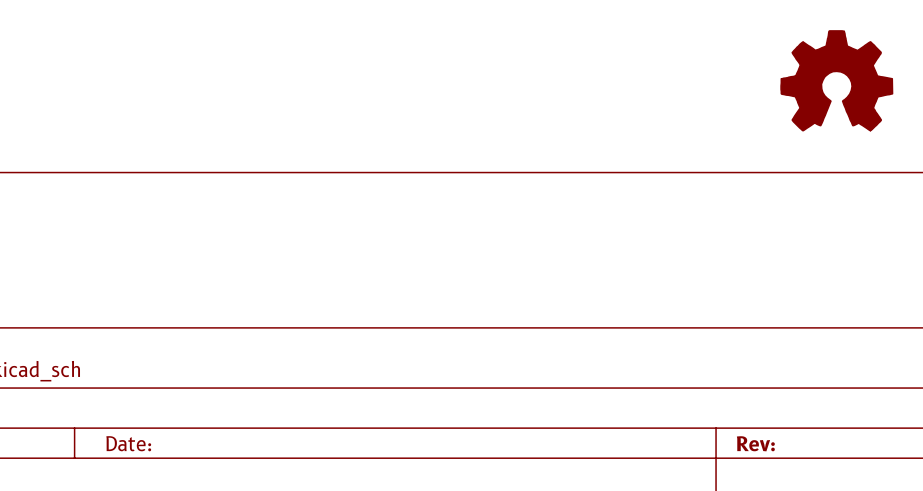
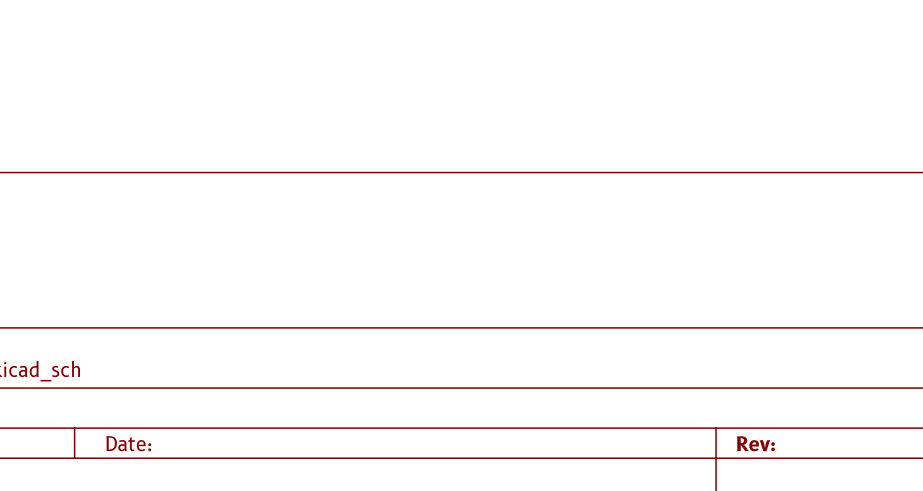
part: (836, 80) -> none

